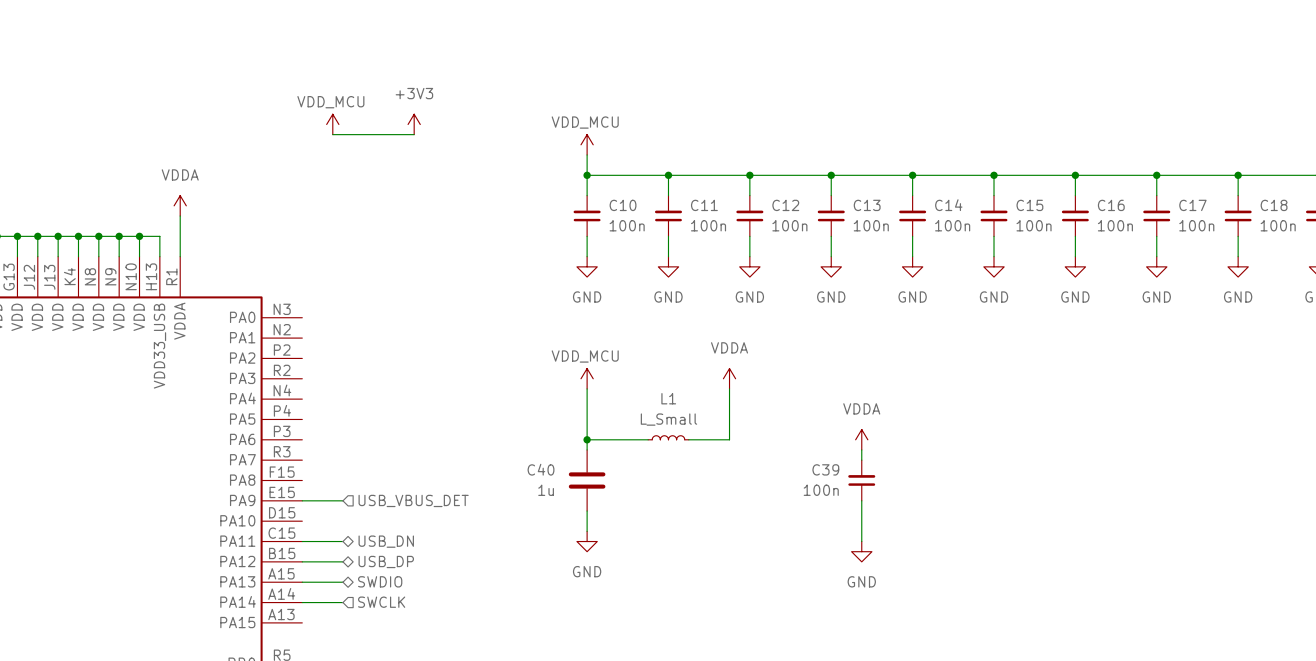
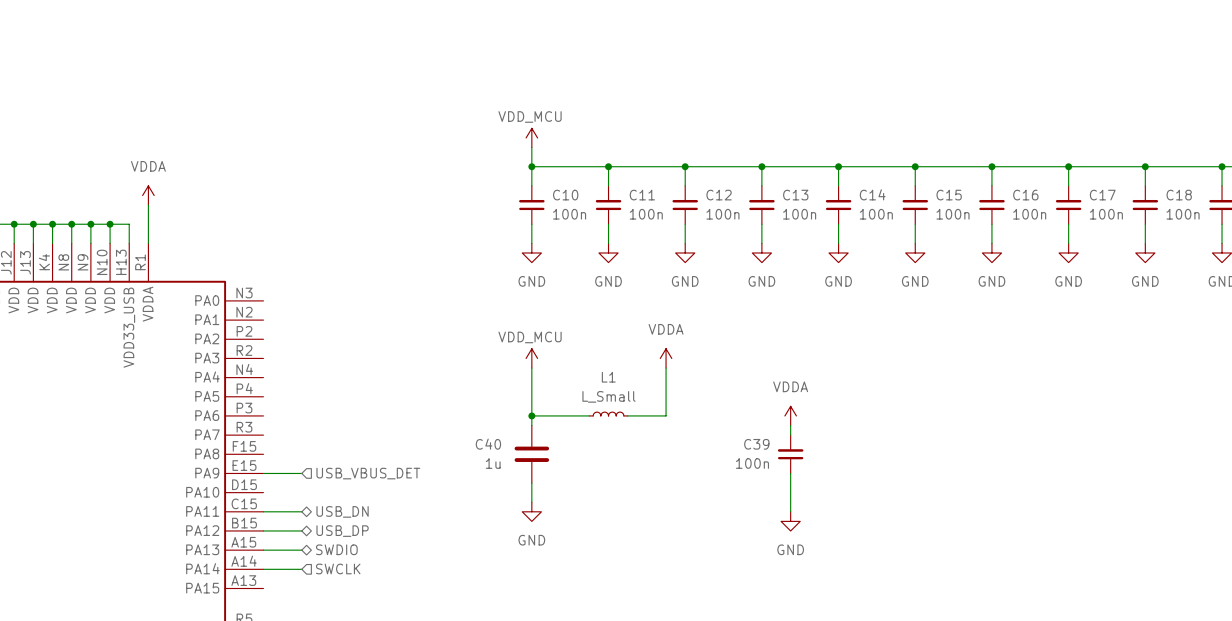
power symbol: VDD_MCU (332, 124) -> none
power symbol: +3V3 (414, 124) -> none
wire: (332, 134) (414, 134) -> none

